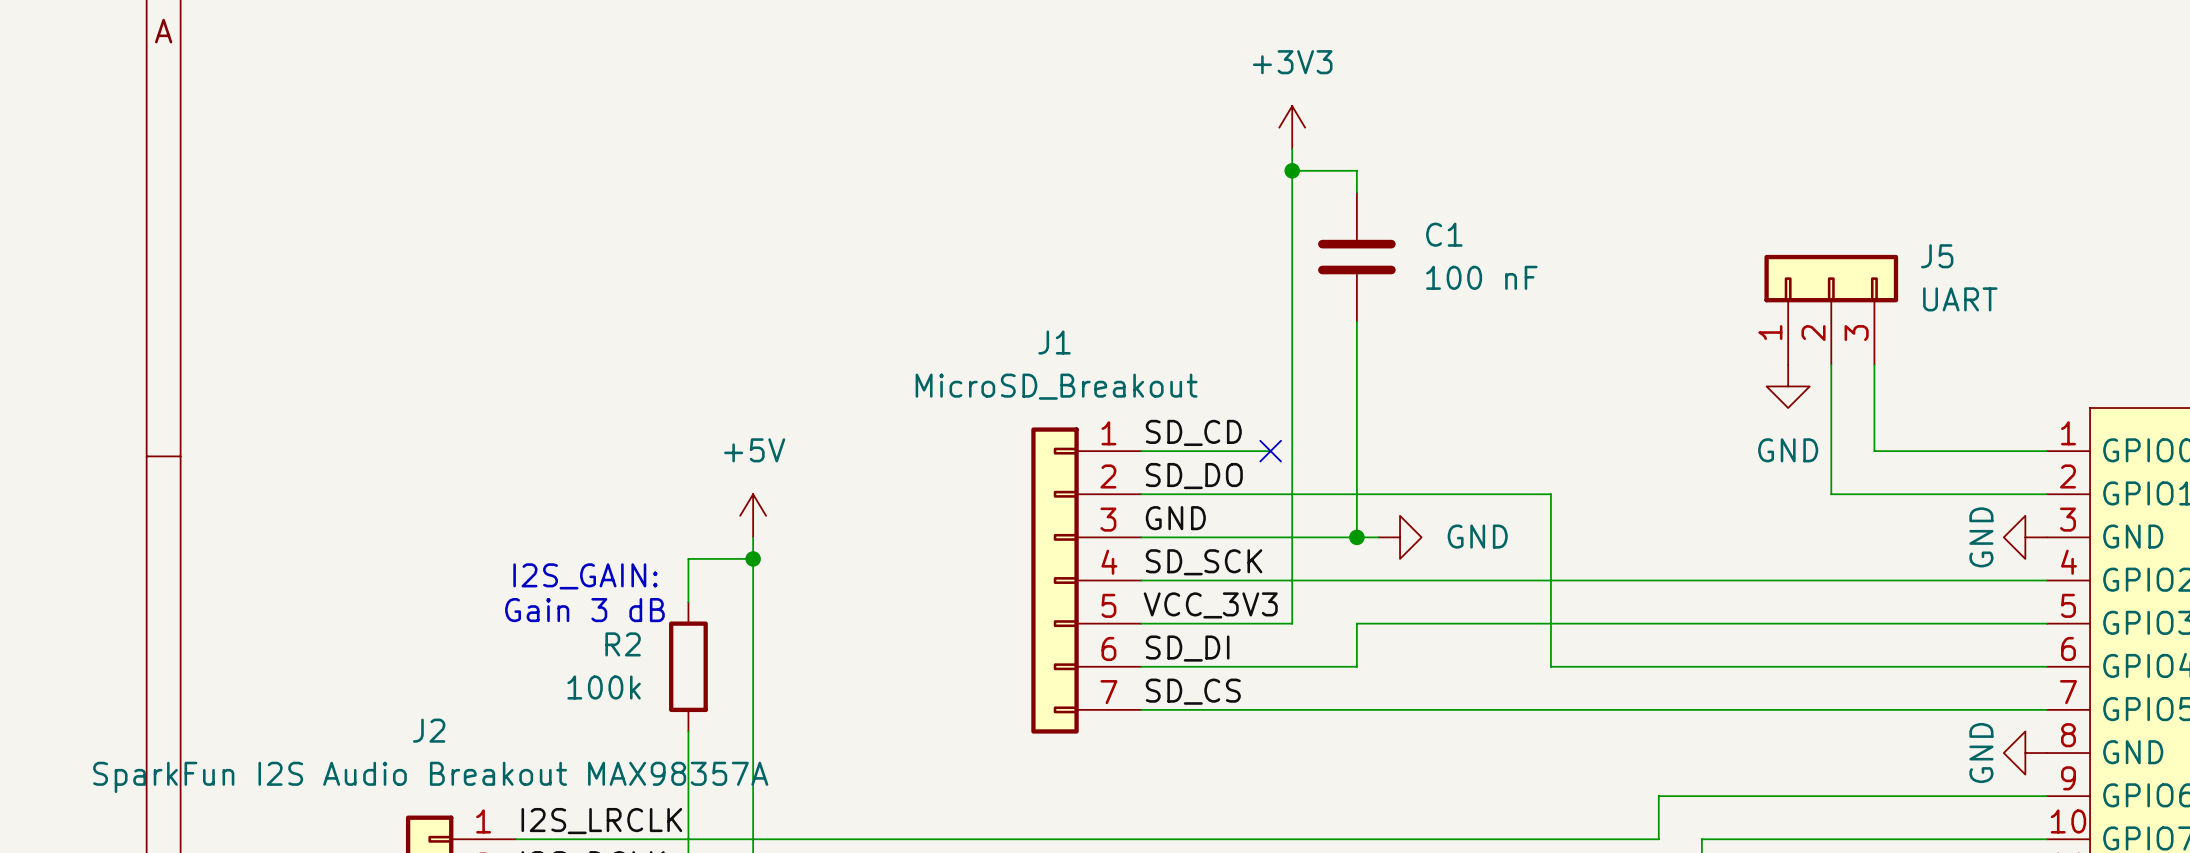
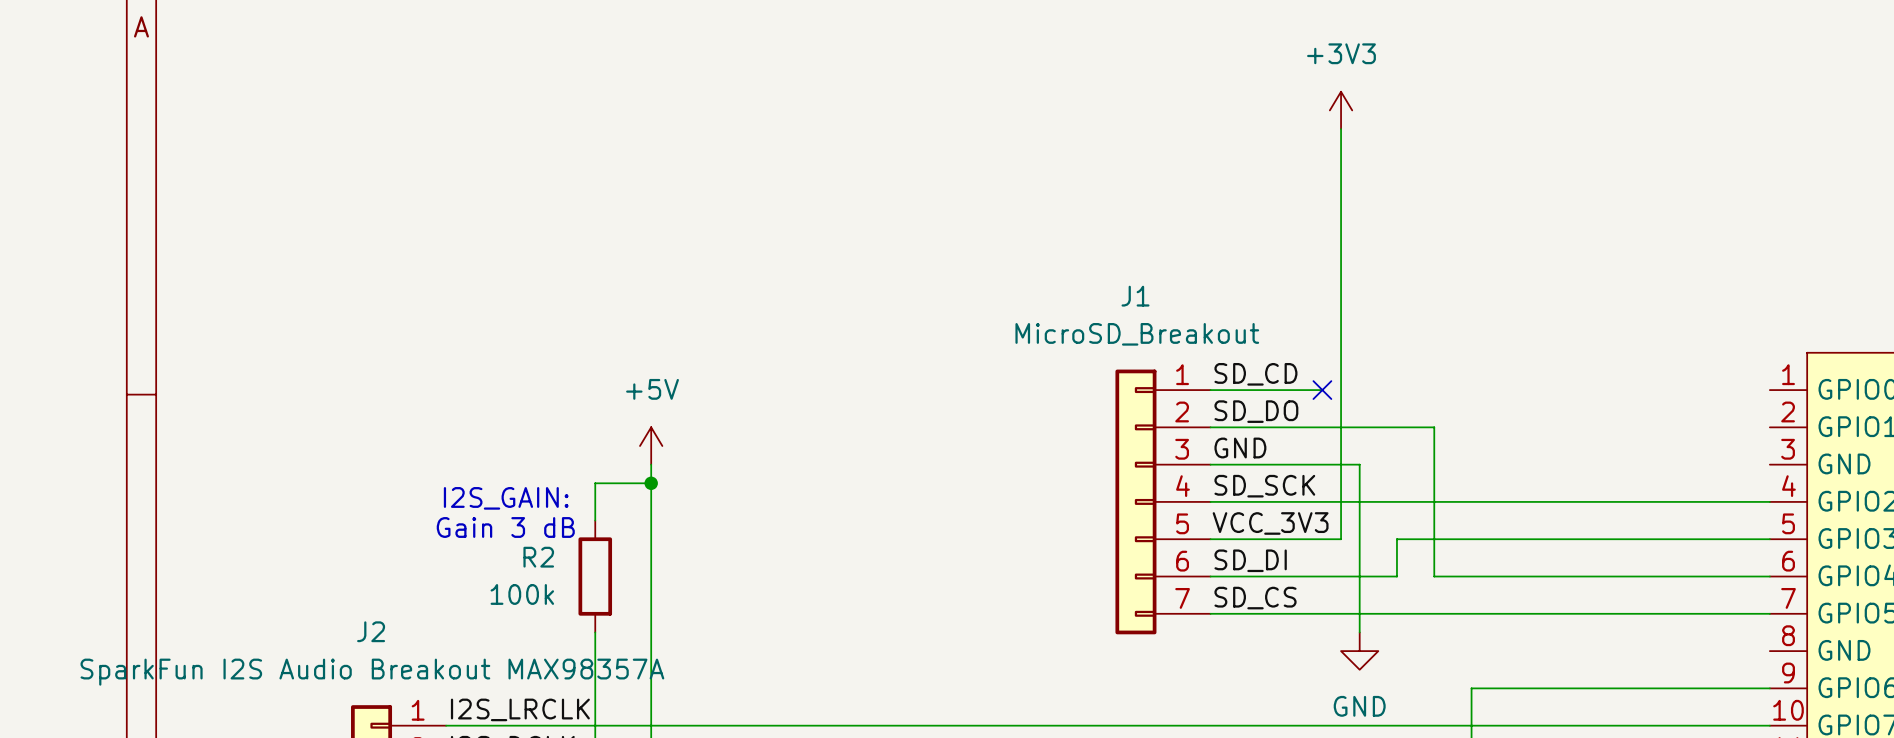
power symbol position: +3V3 (1292, 127) -> +3V3 (1341, 110)
wire: (1292, 149) (1292, 623) (1141, 623) -> none
wire: none -> (1341, 129) (1341, 427) (1434, 427) (1434, 576)
wire: (1292, 170) (1356, 170) (1356, 192) -> none
junction: (1292, 170) -> none
C1: 100 nF (1356, 257) -> none
J5: UART (1831, 309) -> none
wire: (1356, 321) (1356, 537) -> none
wire: (1831, 364) (1831, 494) (2046, 494) -> none
wire: (1874, 364) (1874, 451) (2046, 451) -> none
power symbol: GND (1788, 386) -> none
label position: SD_CD (1193, 432) -> SD_CD (1255, 374)
wire: (1141, 451) (1270, 451) -> (1210, 390) (1322, 390)
no-connect mark: (1270, 451) -> none
no-connect mark: none -> (1322, 390)
label position: SD_DO (1194, 476) -> SD_DO (1256, 411)
wire: (1141, 494) (1400, 494) -> none
label position: GND (1175, 518) -> GND (1240, 448)
wire: (1141, 537) (1378, 537) -> none
junction: (1356, 537) -> none
wire: none -> (1210, 464) (1359, 464) (1359, 632)
power symbol: GND (1400, 537) -> none
power symbol: GND (2025, 537) -> none
label position: SD_SCK (1204, 562) -> SD_SCK (1264, 486)
J1 position: (1086, 580) -> (1162, 501)
wire: (1141, 580) (1400, 580) -> none
label position: VCC_3V3 (1210, 605) -> VCC_3V3 (1270, 523)
wire: (1400, 623) (1356, 623) (1356, 666) (1141, 666) -> none
wire: (1615, 623) (1550, 623) (1550, 666) -> (1210, 576) (1341, 576)
label position: SD_DI (1187, 648) -> SD_DI (1250, 560)
wire: (1615, 666) (1658, 666) -> (1396, 576) (1396, 539)
label position: SD_CS (1193, 691) -> SD_CS (1255, 598)
wire: (1141, 709) (1400, 709) -> none
power symbol: none -> GND (1359, 651)
power symbol: GND (2025, 753) -> none
wire: (1701, 796) (1658, 796) (1658, 839) -> (1471, 688) (1471, 725) (1434, 725)

